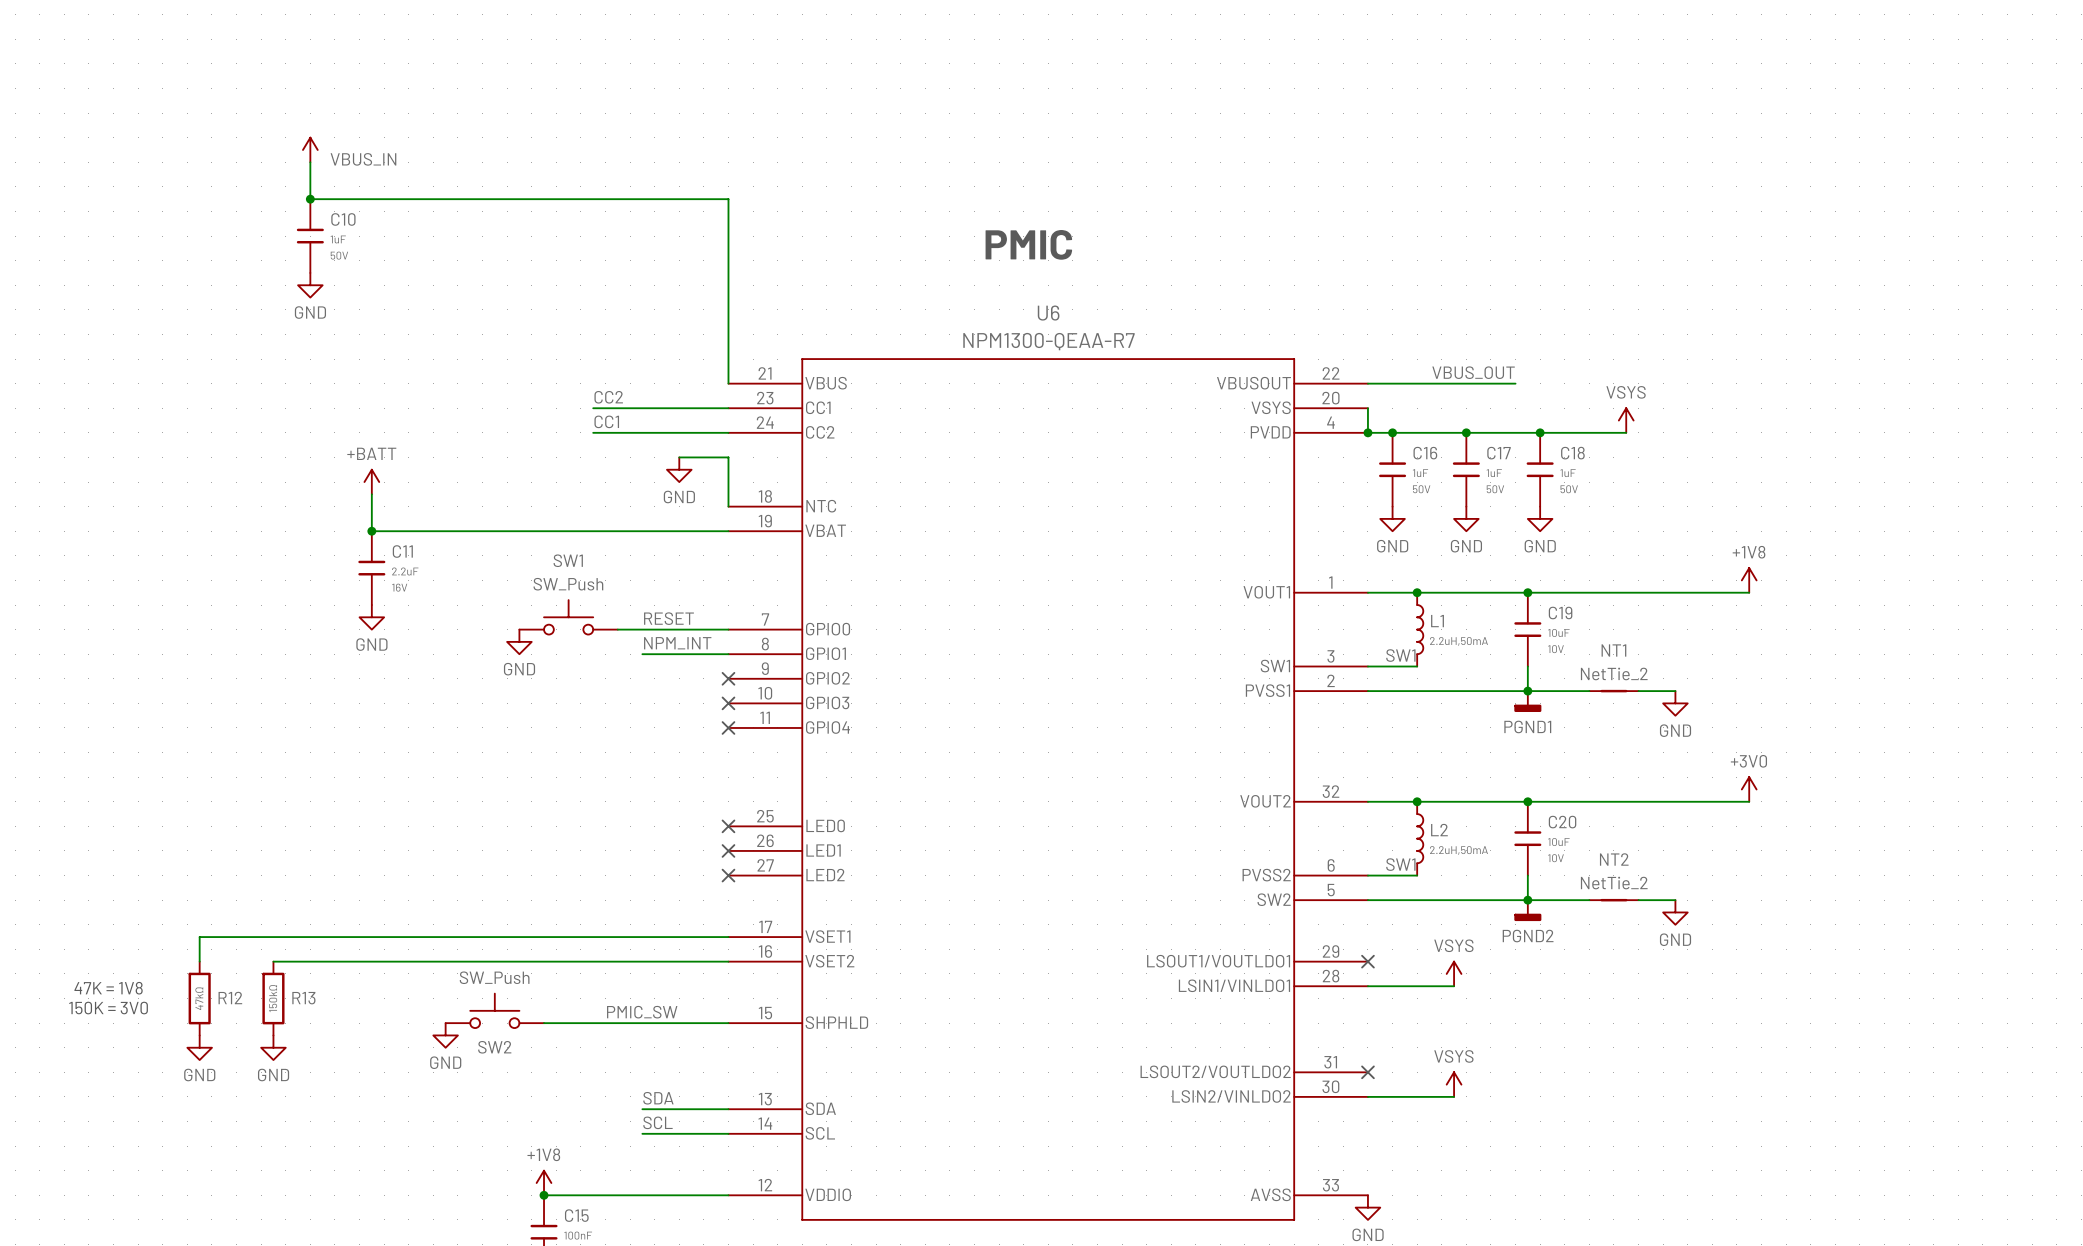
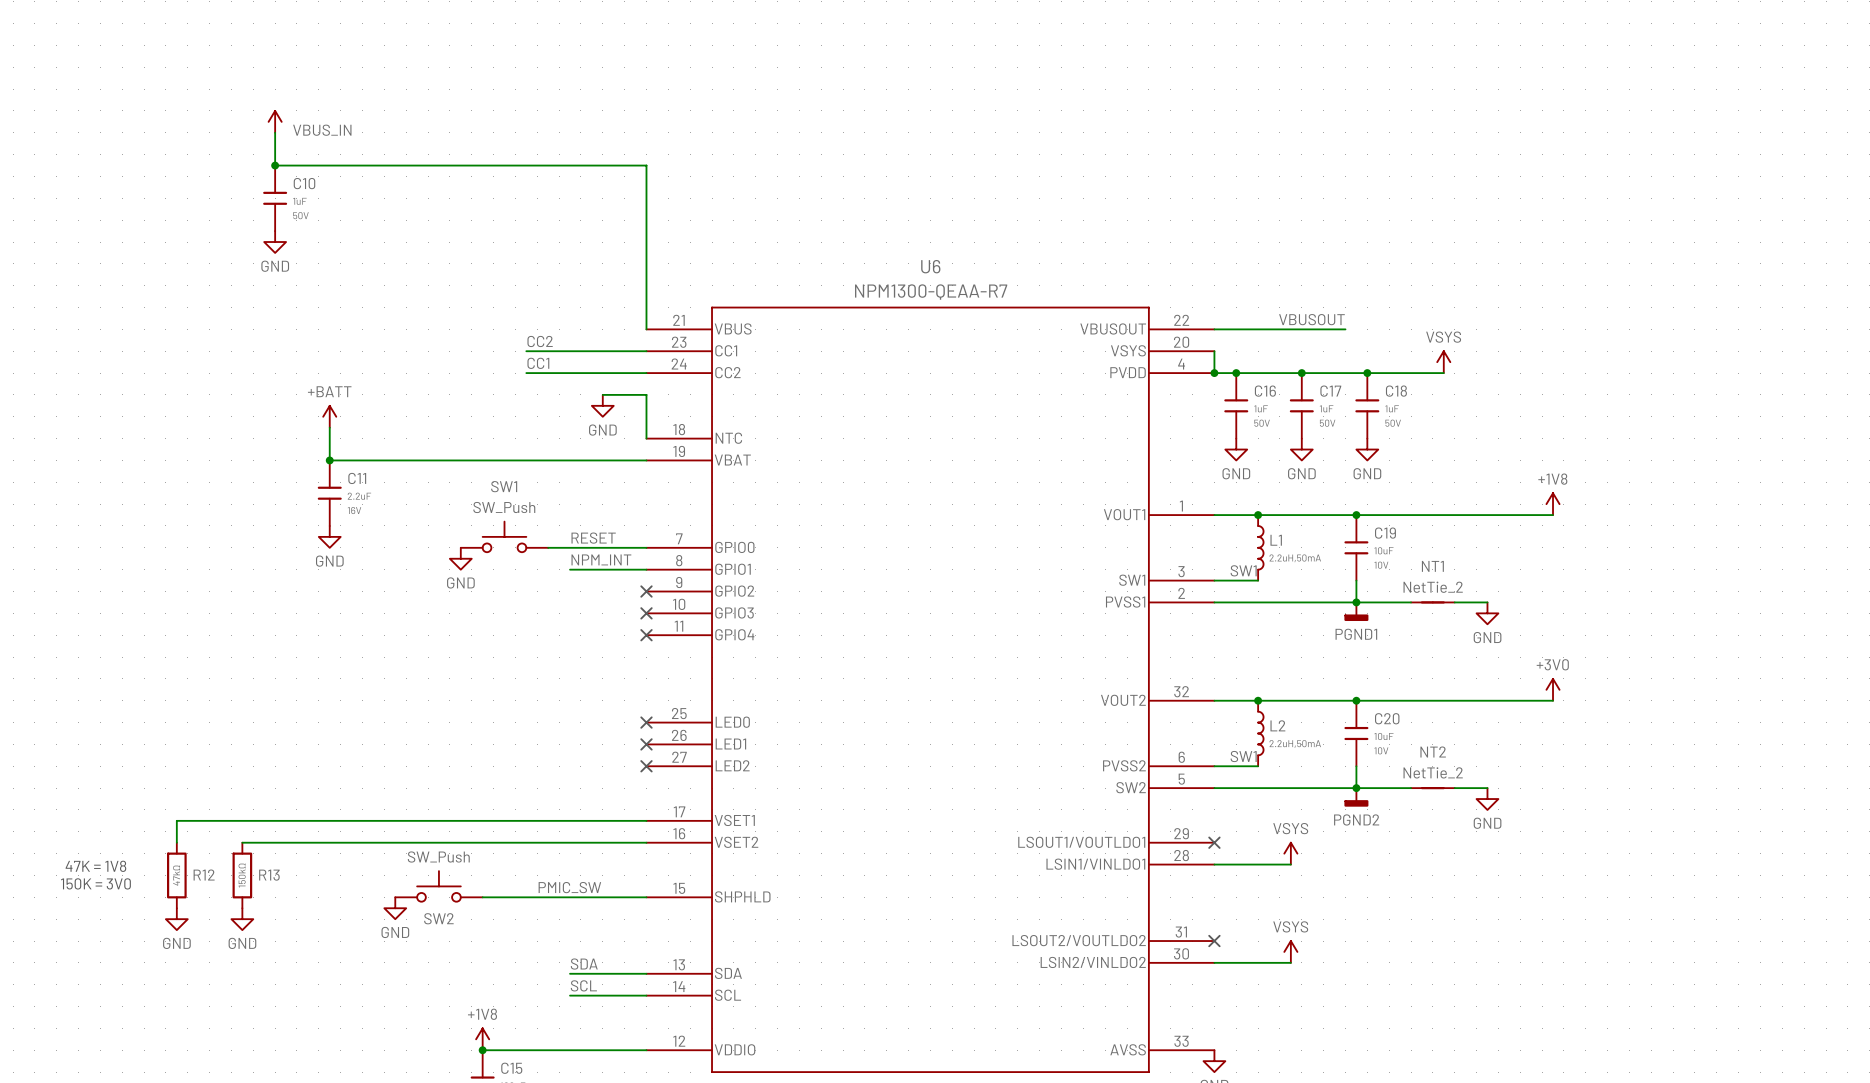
text: PMIC (1028, 244) -> none
label: VBUS_OUT (1473, 372) -> VBUSOUT (1311, 319)

